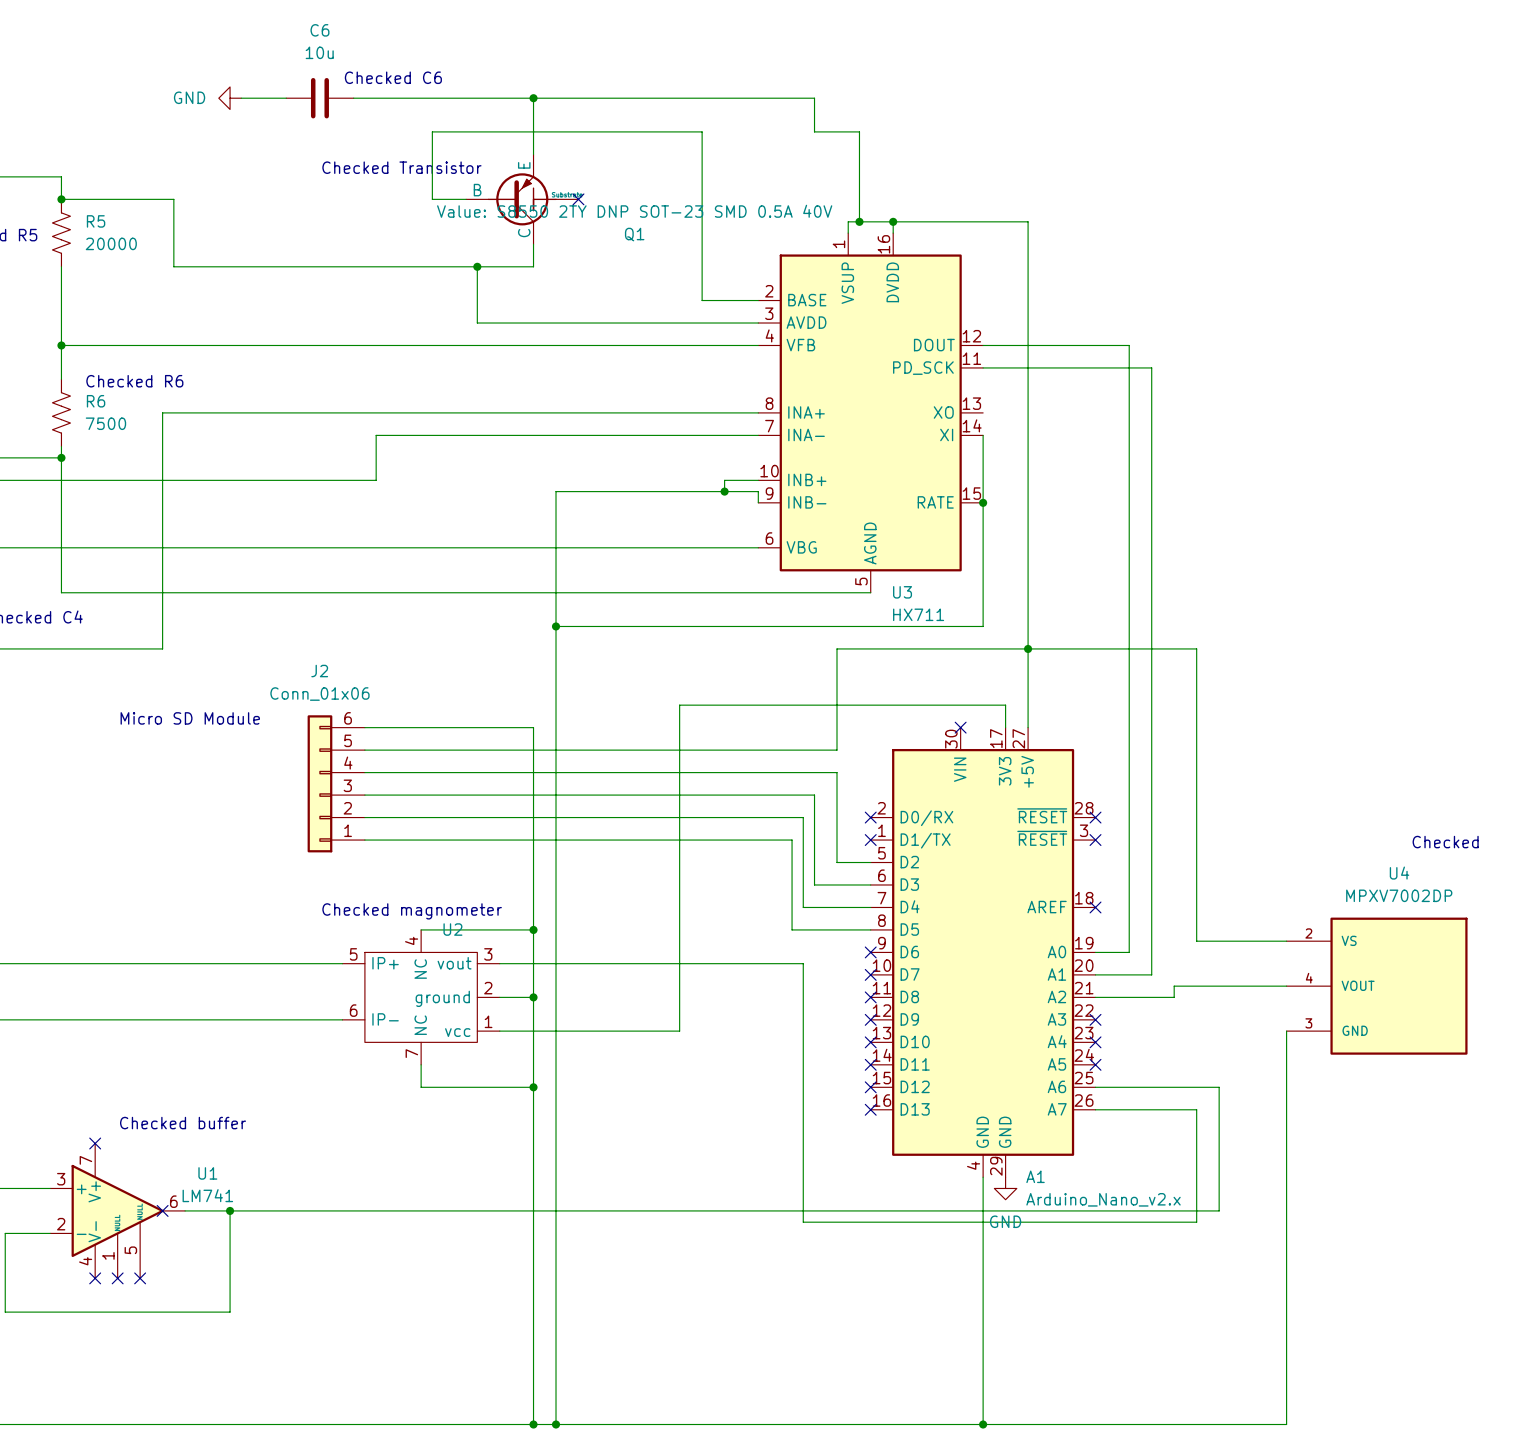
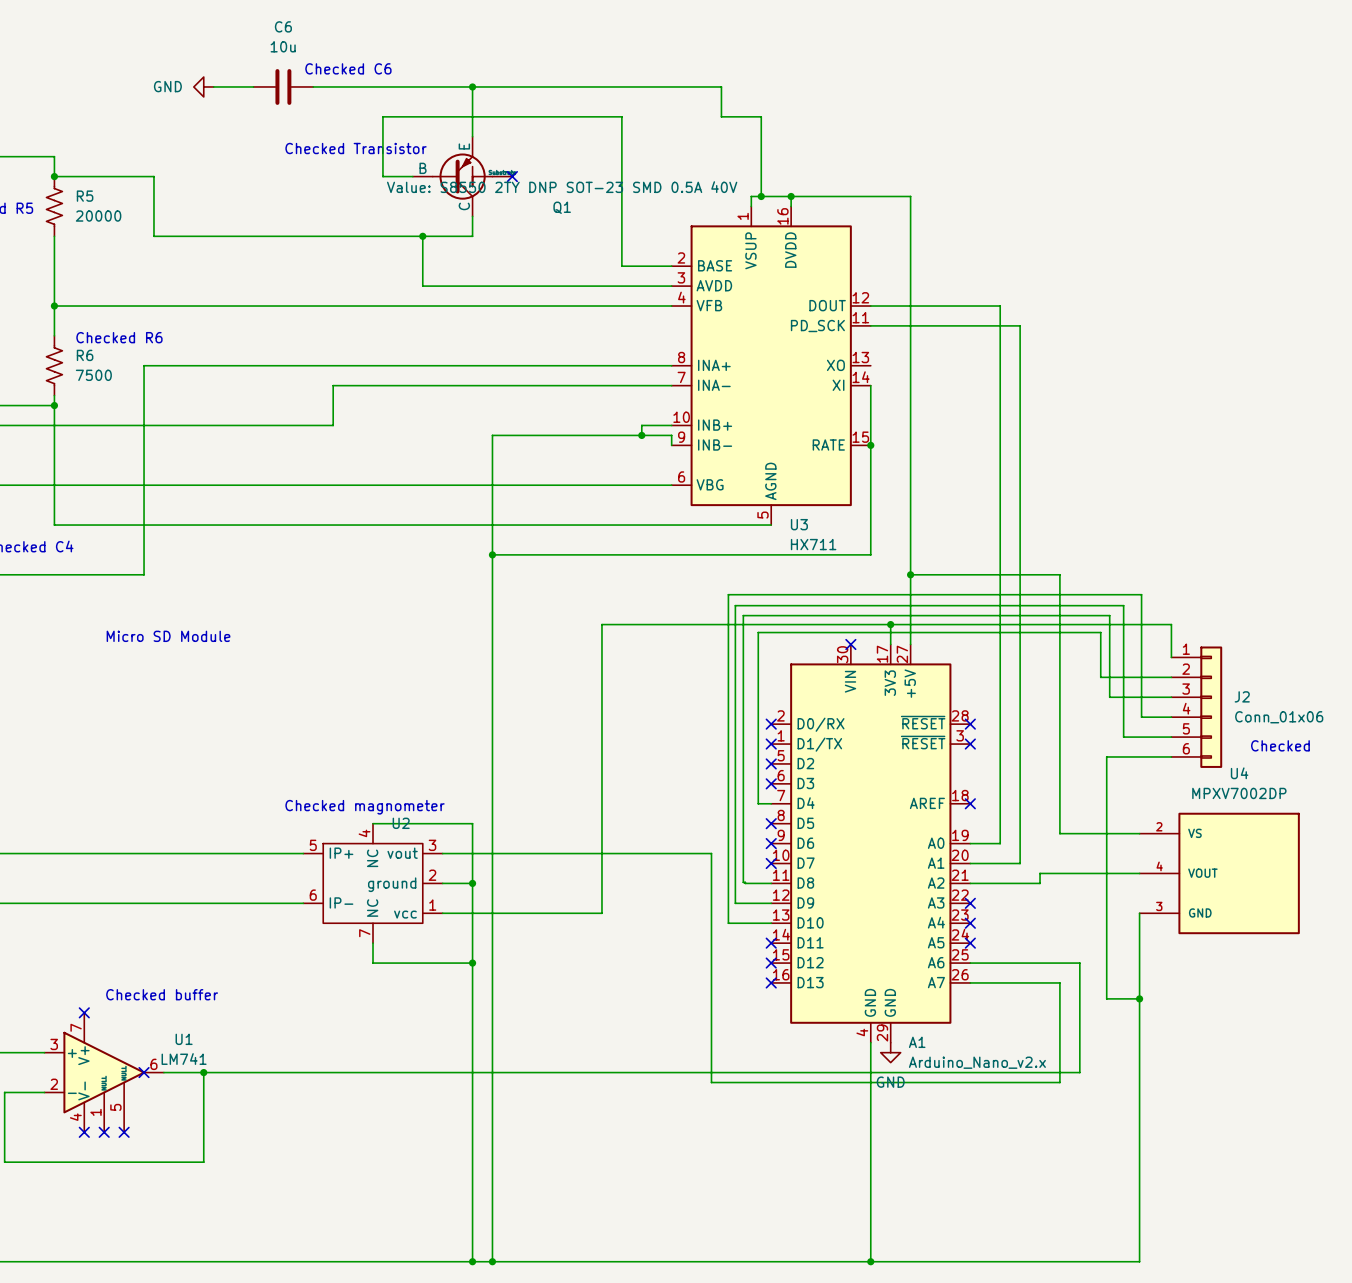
wire: (1028, 648) (837, 648) (837, 750) (364, 750) -> none
J2 name position: J2 (319, 671) -> J2 (1242, 696)
J2 value position: Conn_01x06 (319, 694) -> Conn_01x06 (1279, 717)
wire: none -> (890, 624) (1171, 624) (1171, 657)
junction: none -> (890, 624)
wire: (364, 727) (533, 727) (533, 929) -> none
wire: (364, 772) (837, 772) (837, 862) (870, 862) -> none
J2 rotation: 0° (319, 783) -> 180° (1211, 707)
J2 position: (336, 783) -> (1196, 707)
wire: none -> (1171, 697) (1109, 697) (1109, 615) (743, 615) (743, 882) (771, 883)
wire: (364, 795) (814, 795) (814, 884) (870, 884) -> none
wire: none -> (1171, 717) (1141, 717) (1141, 594) (728, 594) (728, 923) (771, 923)
wire: (364, 817) (803, 817) (803, 907) (856, 907) -> (1171, 677) (1100, 677) (1100, 632) (758, 632) (758, 803)
wire: none -> (1171, 737) (1123, 737) (1123, 605) (735, 605) (735, 903) (771, 903)
wire: (364, 840) (792, 840) (792, 929) (870, 929) -> none
wire: none -> (1171, 756) (1106, 756) (1106, 998) (1139, 998)
no-connect mark: none -> (771, 763)
no-connect mark: none -> (771, 783)
junction: (533, 929) -> none
no-connect mark: none -> (771, 823)
no-connect mark: (870, 997) -> none
no-connect mark: (870, 1019) -> none
no-connect mark: (870, 1042) -> none
junction: none -> (1139, 998)

